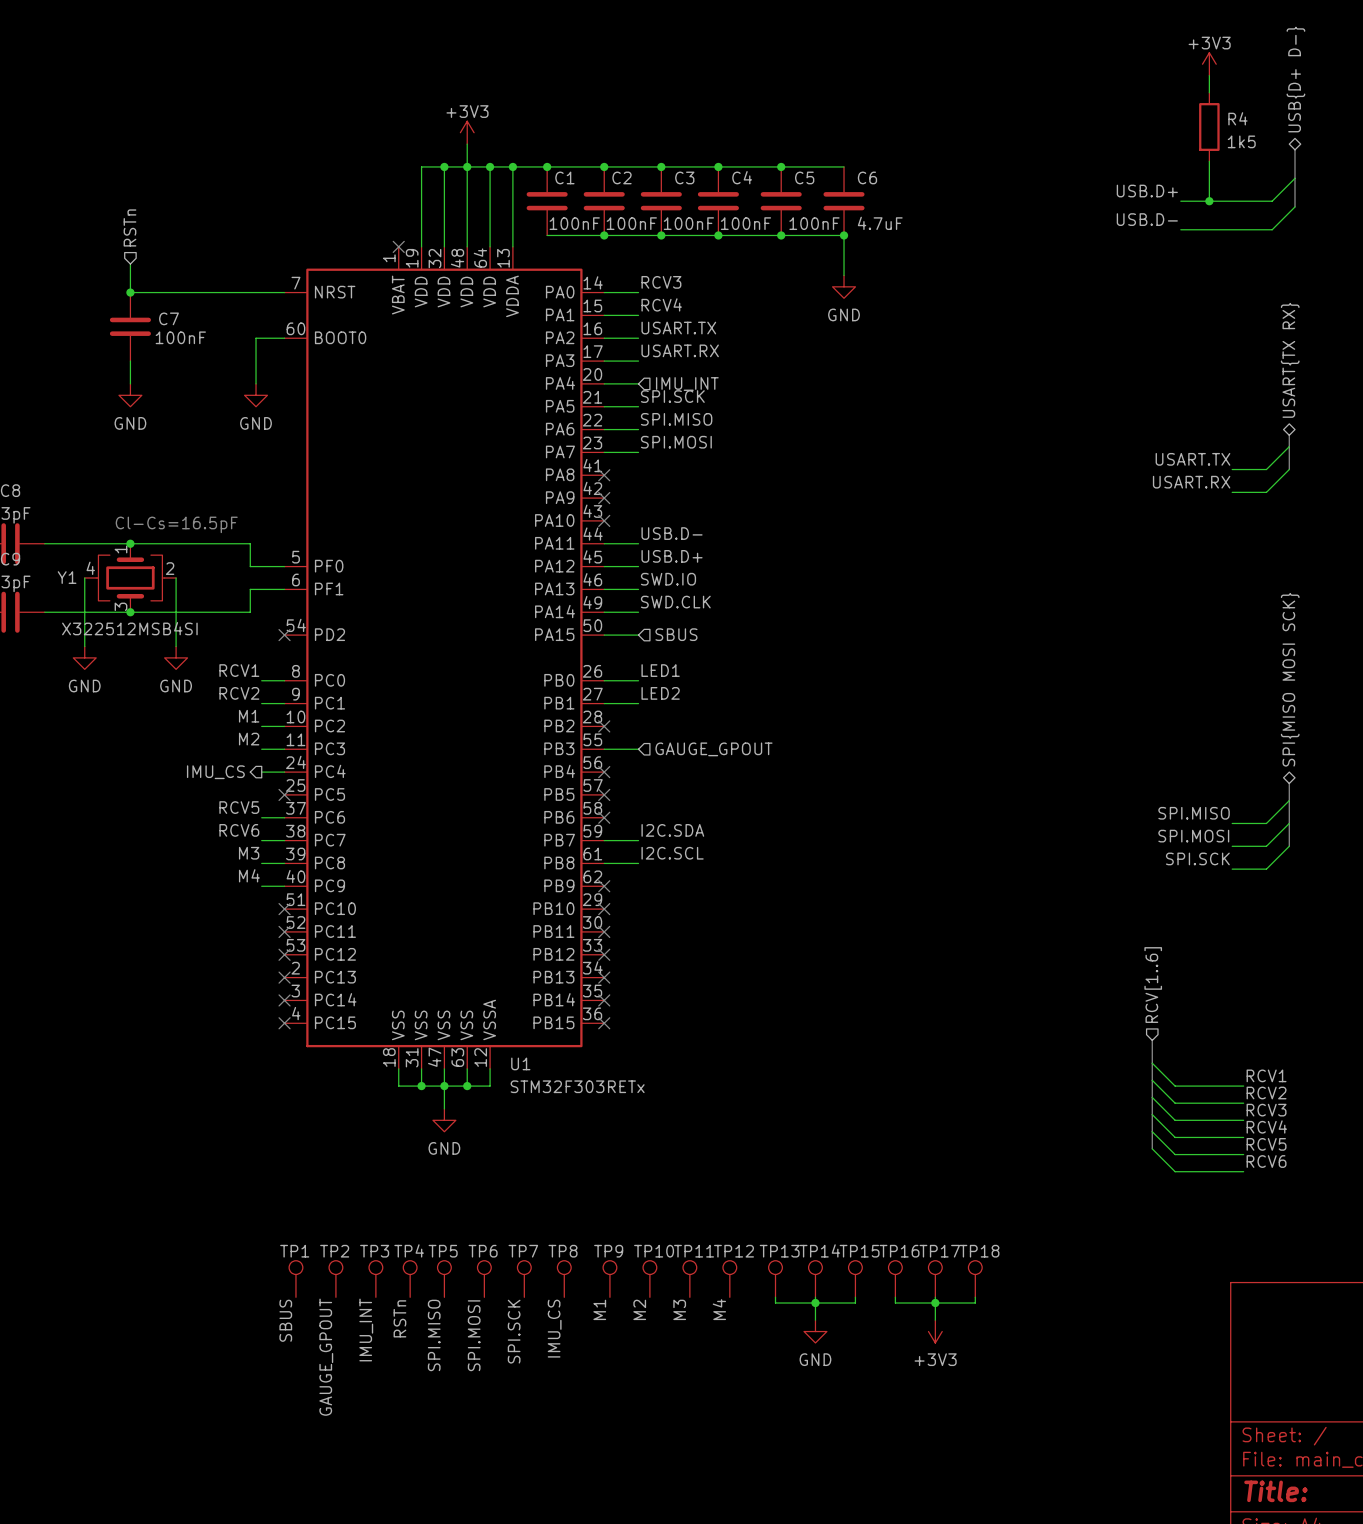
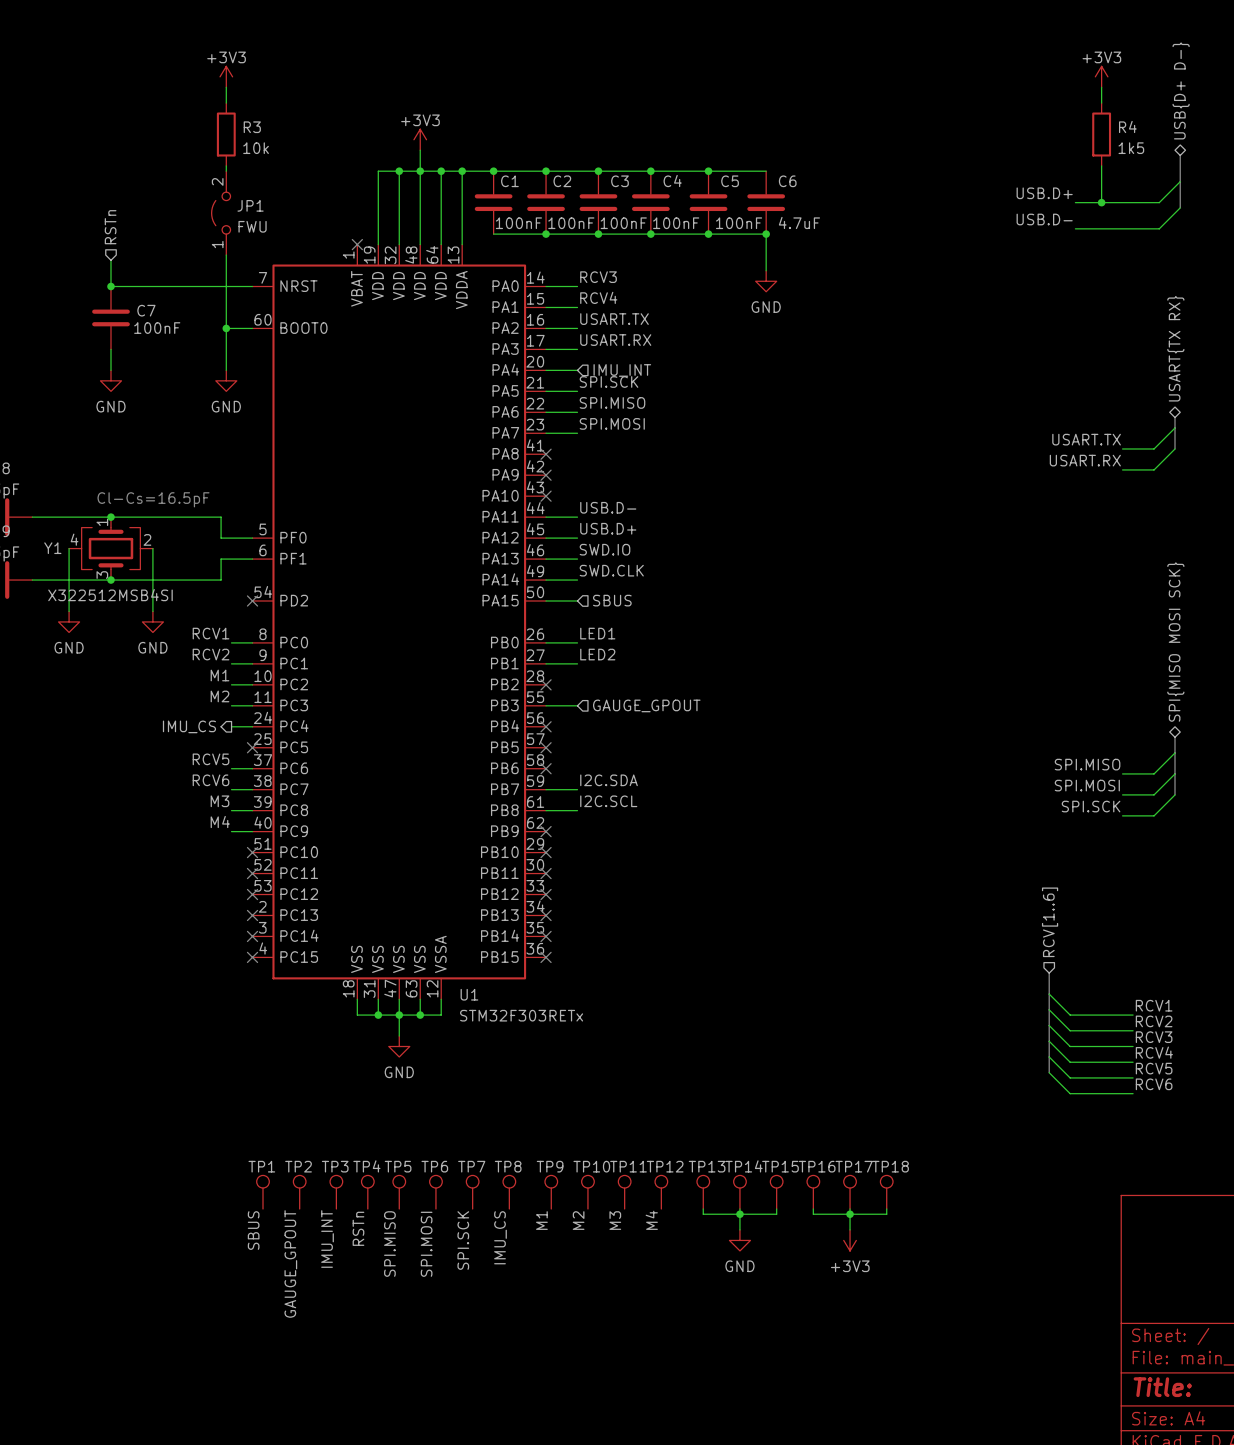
power symbol: none -> +3V3 (226, 76)
wire: none -> (226, 87) (226, 103)
R3: none -> 10k (226, 134)
wire: none -> (226, 165) (226, 171)
JP1: none -> FWU (221, 213)
wire: none -> (226, 255) (226, 328)
junction: none -> (226, 328)

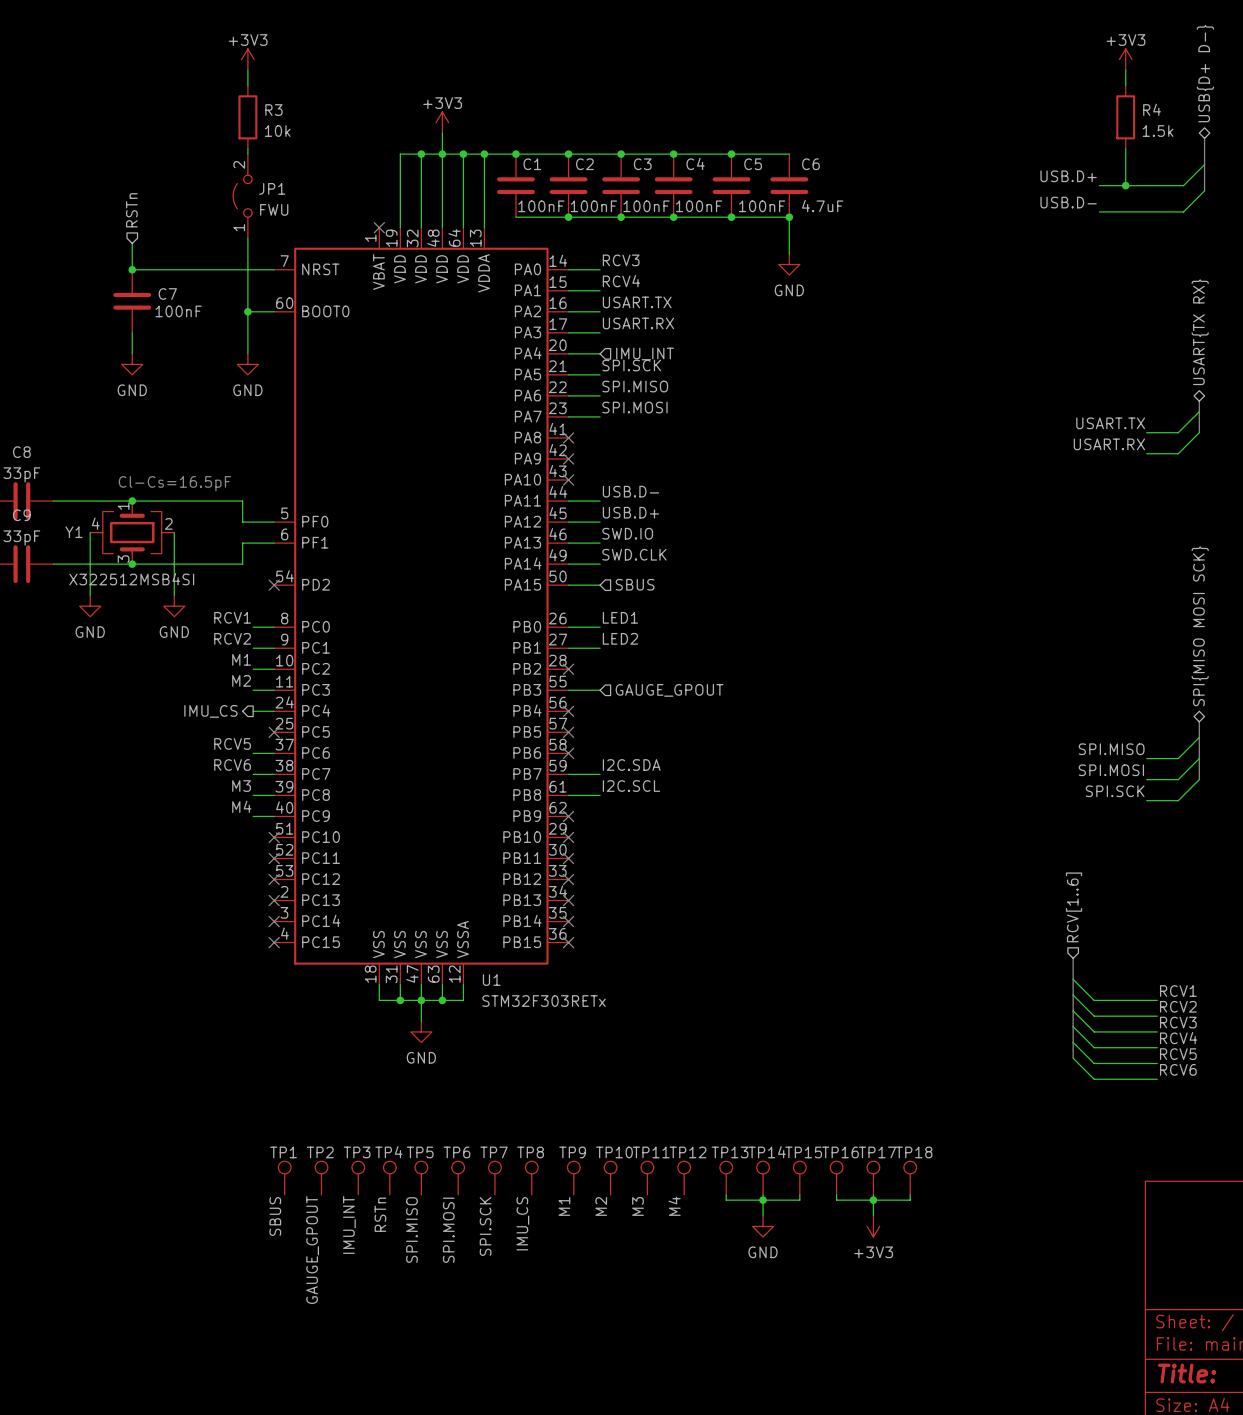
R4 value: 1k5 (1131, 148) -> 1.5k (1158, 131)

